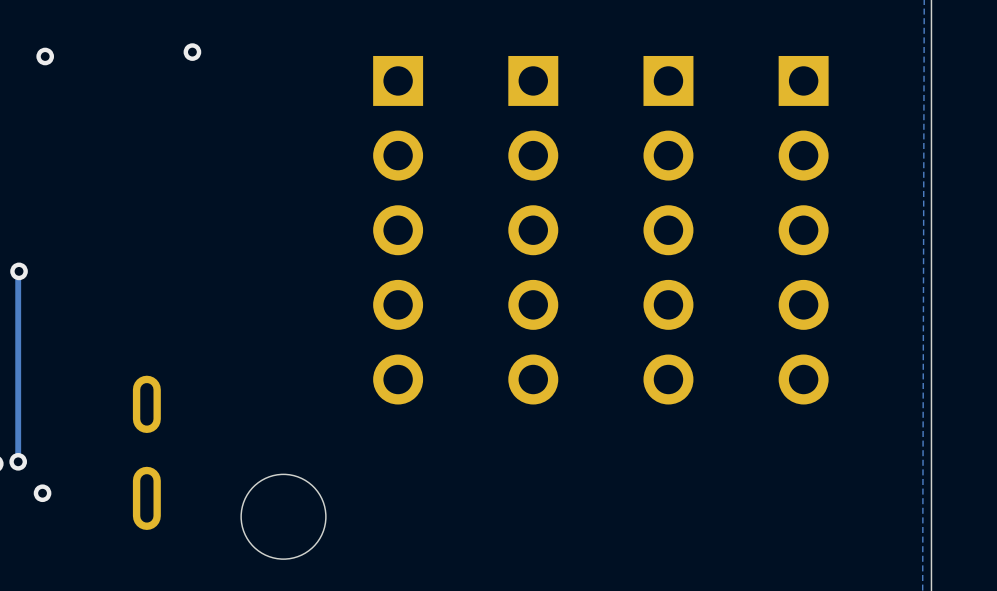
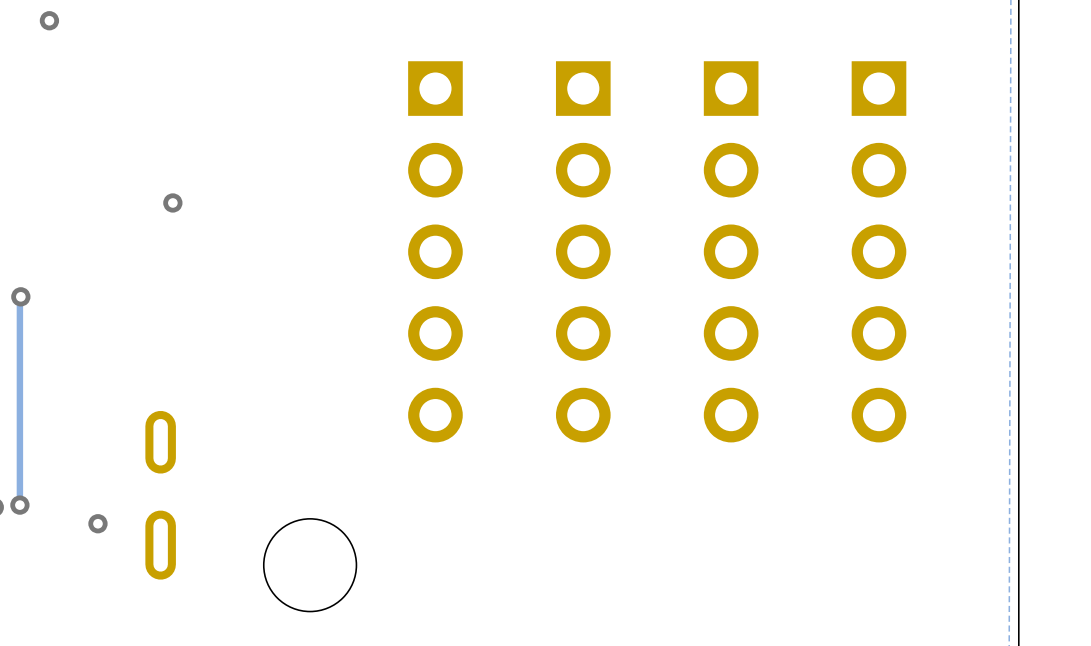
via: (192, 52) -> none
via position: (45, 56) -> (49, 20)
via: none -> (172, 202)
via position: (42, 493) -> (97, 523)

